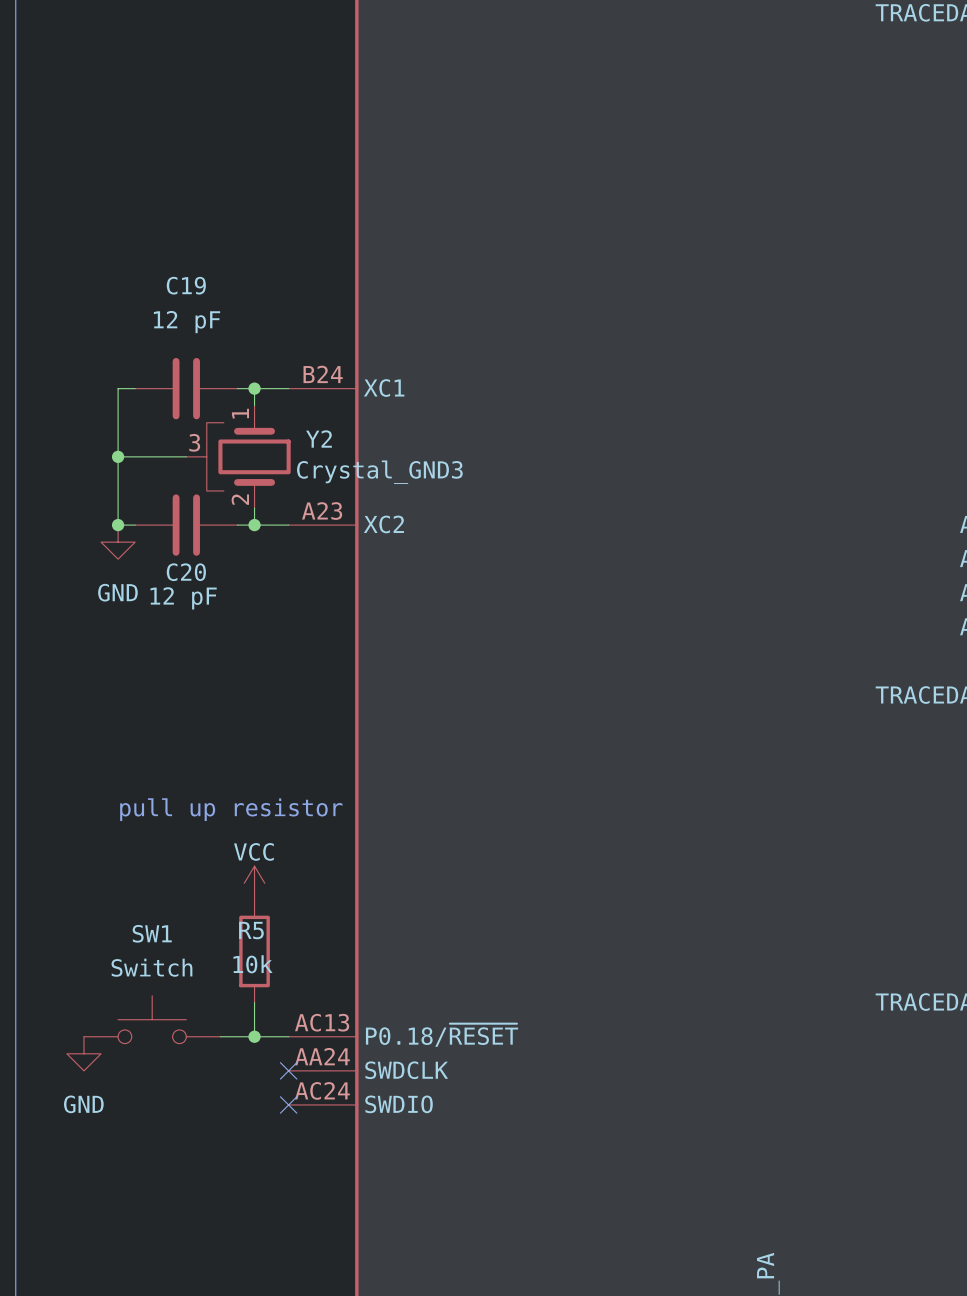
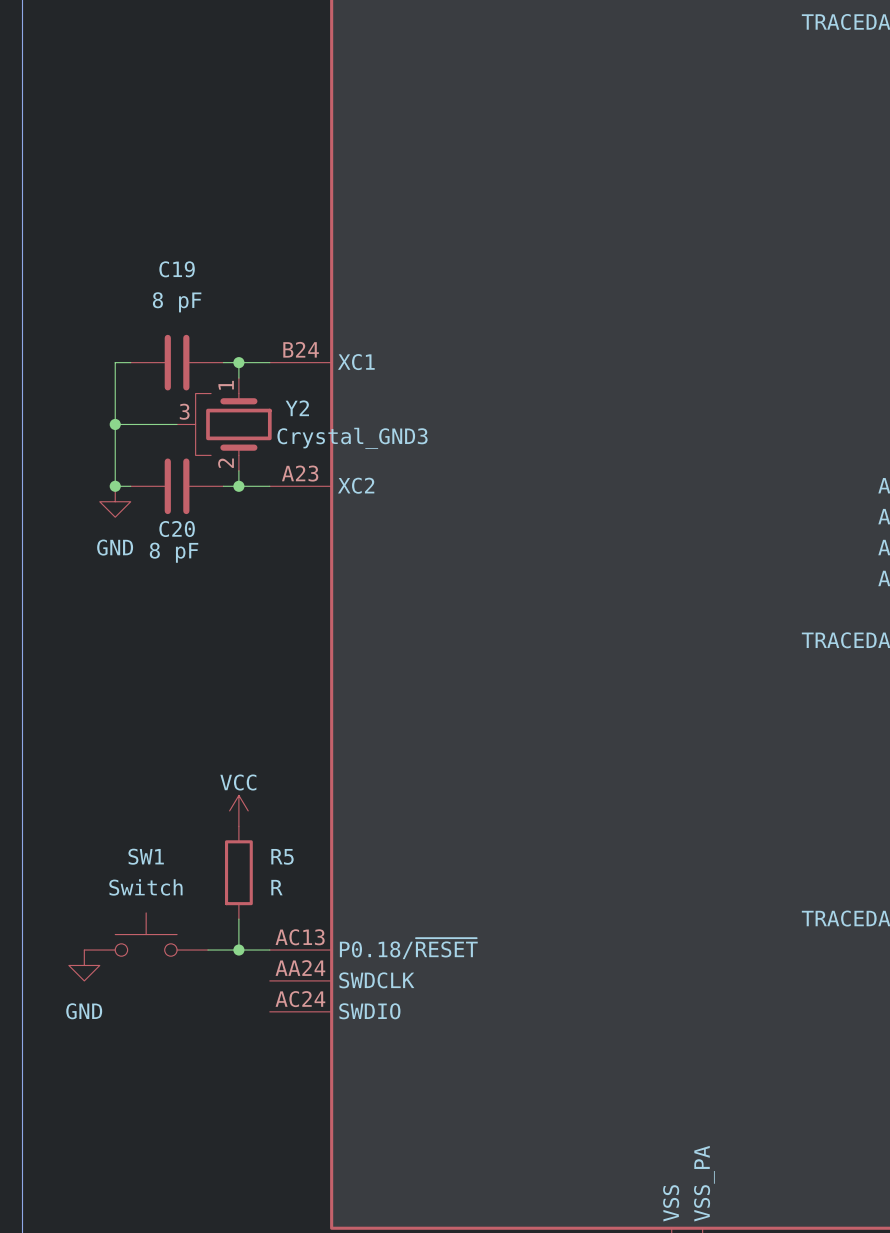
C19 value: 12 pF (187, 322) -> 8 pF (177, 302)
C20 value: 12 pF (183, 598) -> 8 pF (174, 552)
text: pull up resistor (231, 809) -> none
R5 name position: R5 (251, 930) -> R5 (282, 856)
R5 value: 10k (253, 964) -> R (276, 887)
no-connect mark: (288, 1070) -> none
no-connect mark: (288, 1104) -> none

